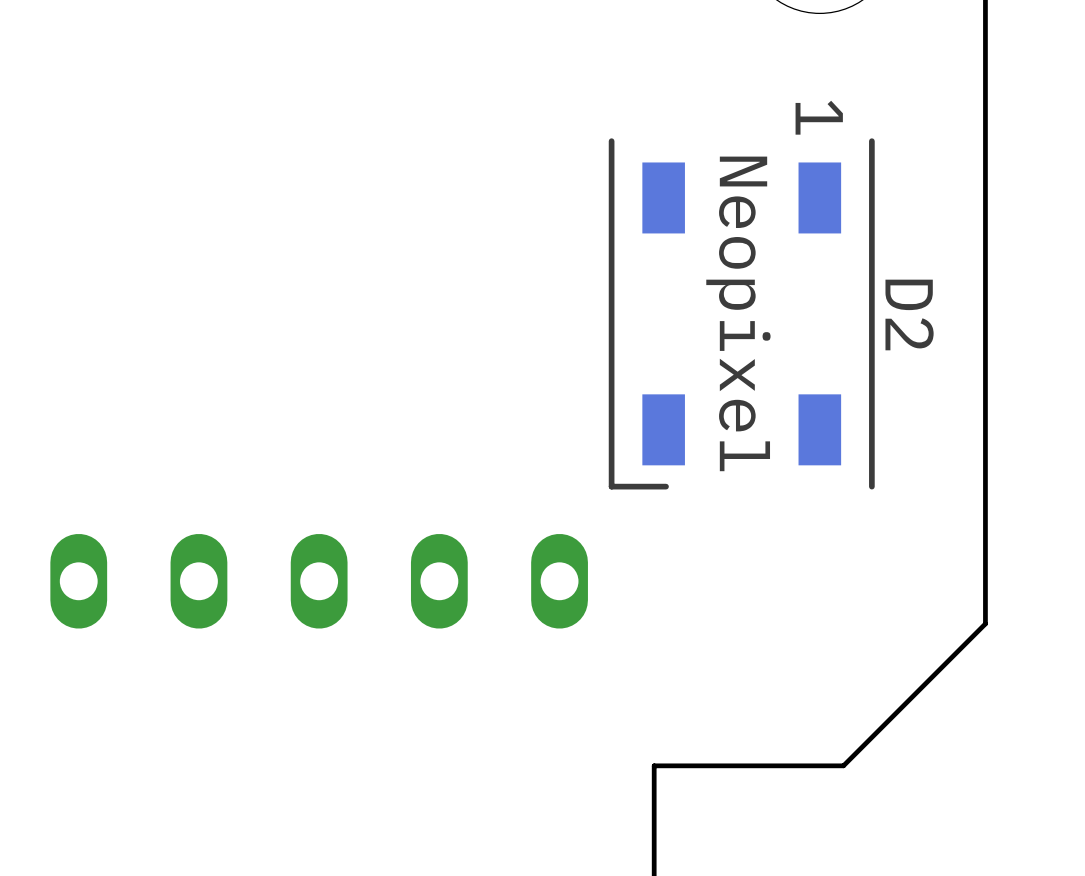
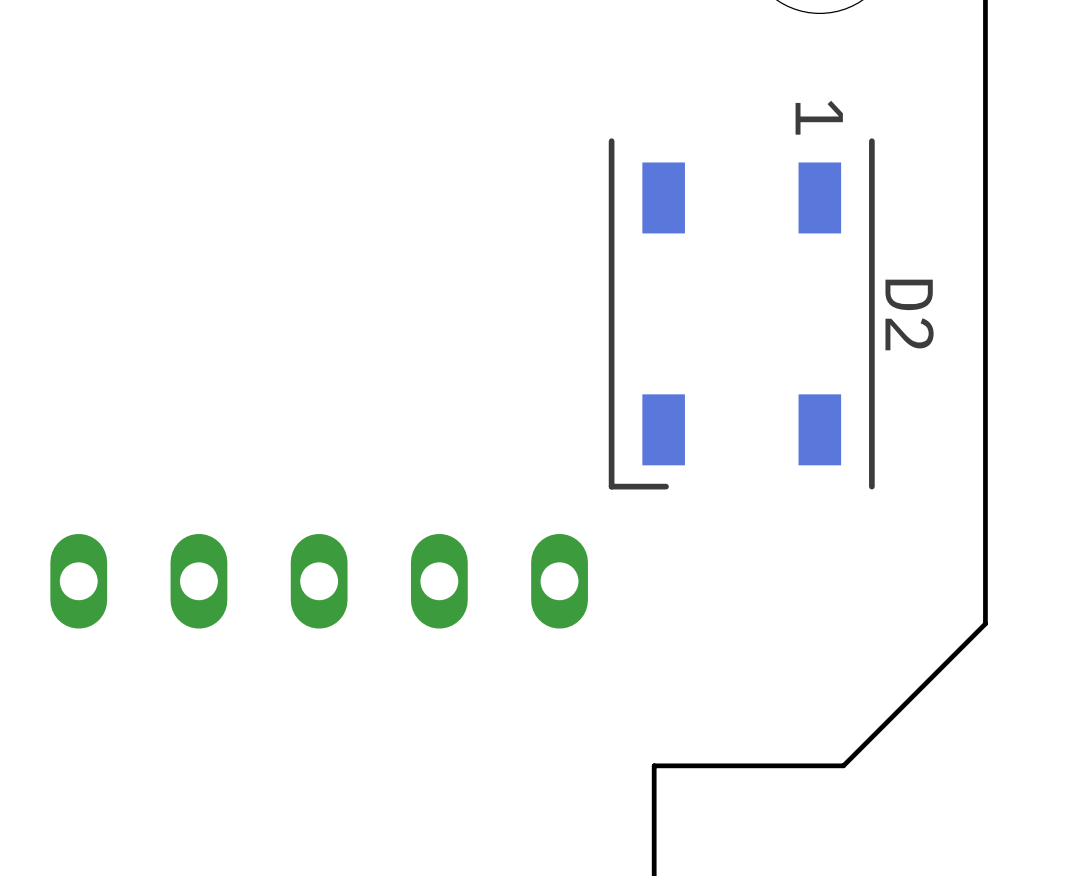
D2 value: Neopixel (738, 313) -> none

